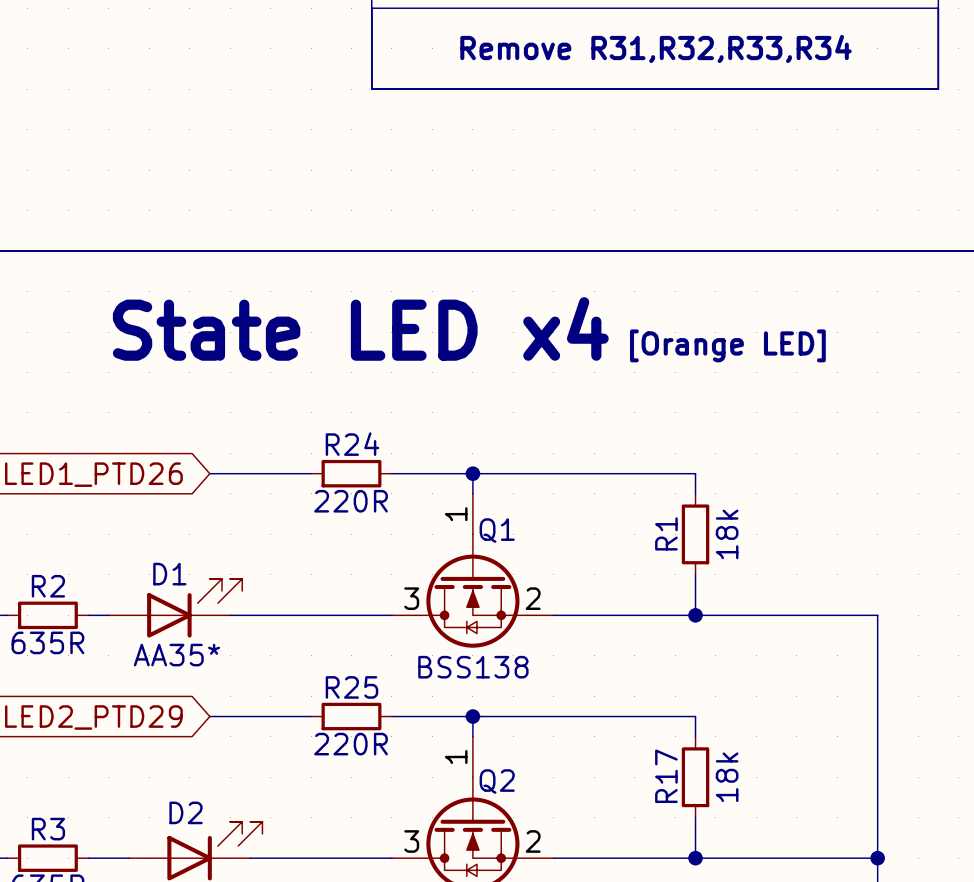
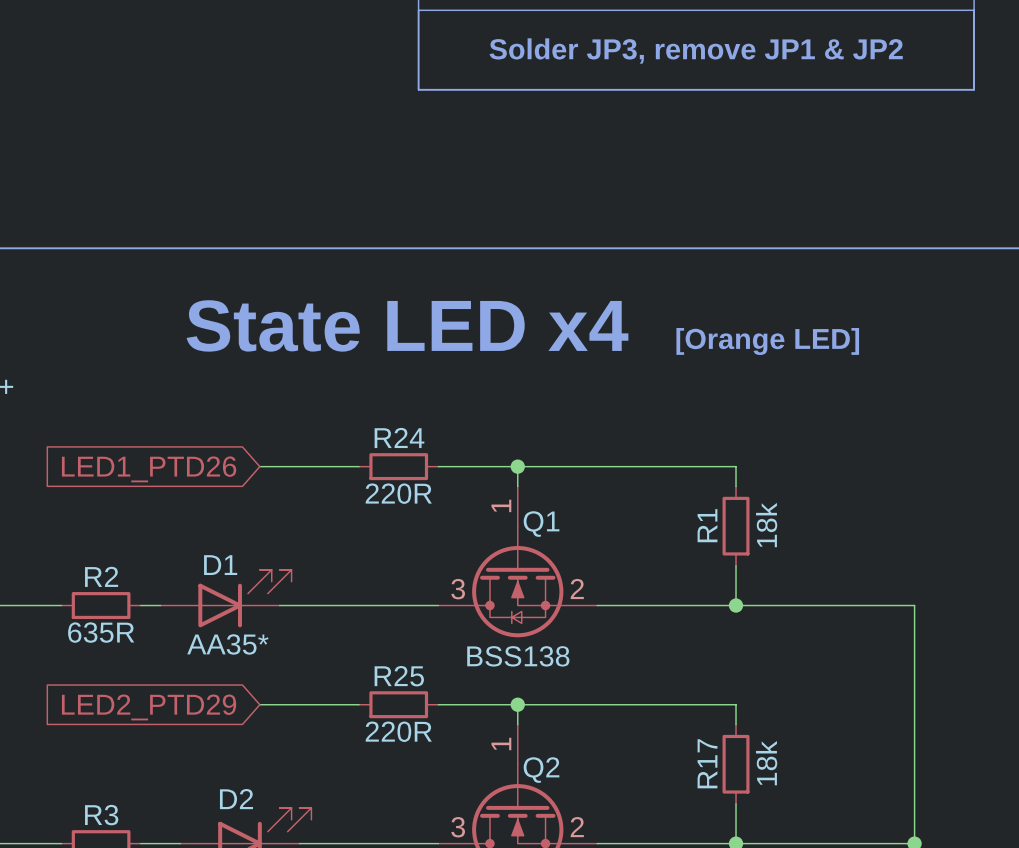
text: Remove R31,R32,R33,R34 (656, 48) -> Solder JP3, remove JP1 & JP2 (696, 51)

